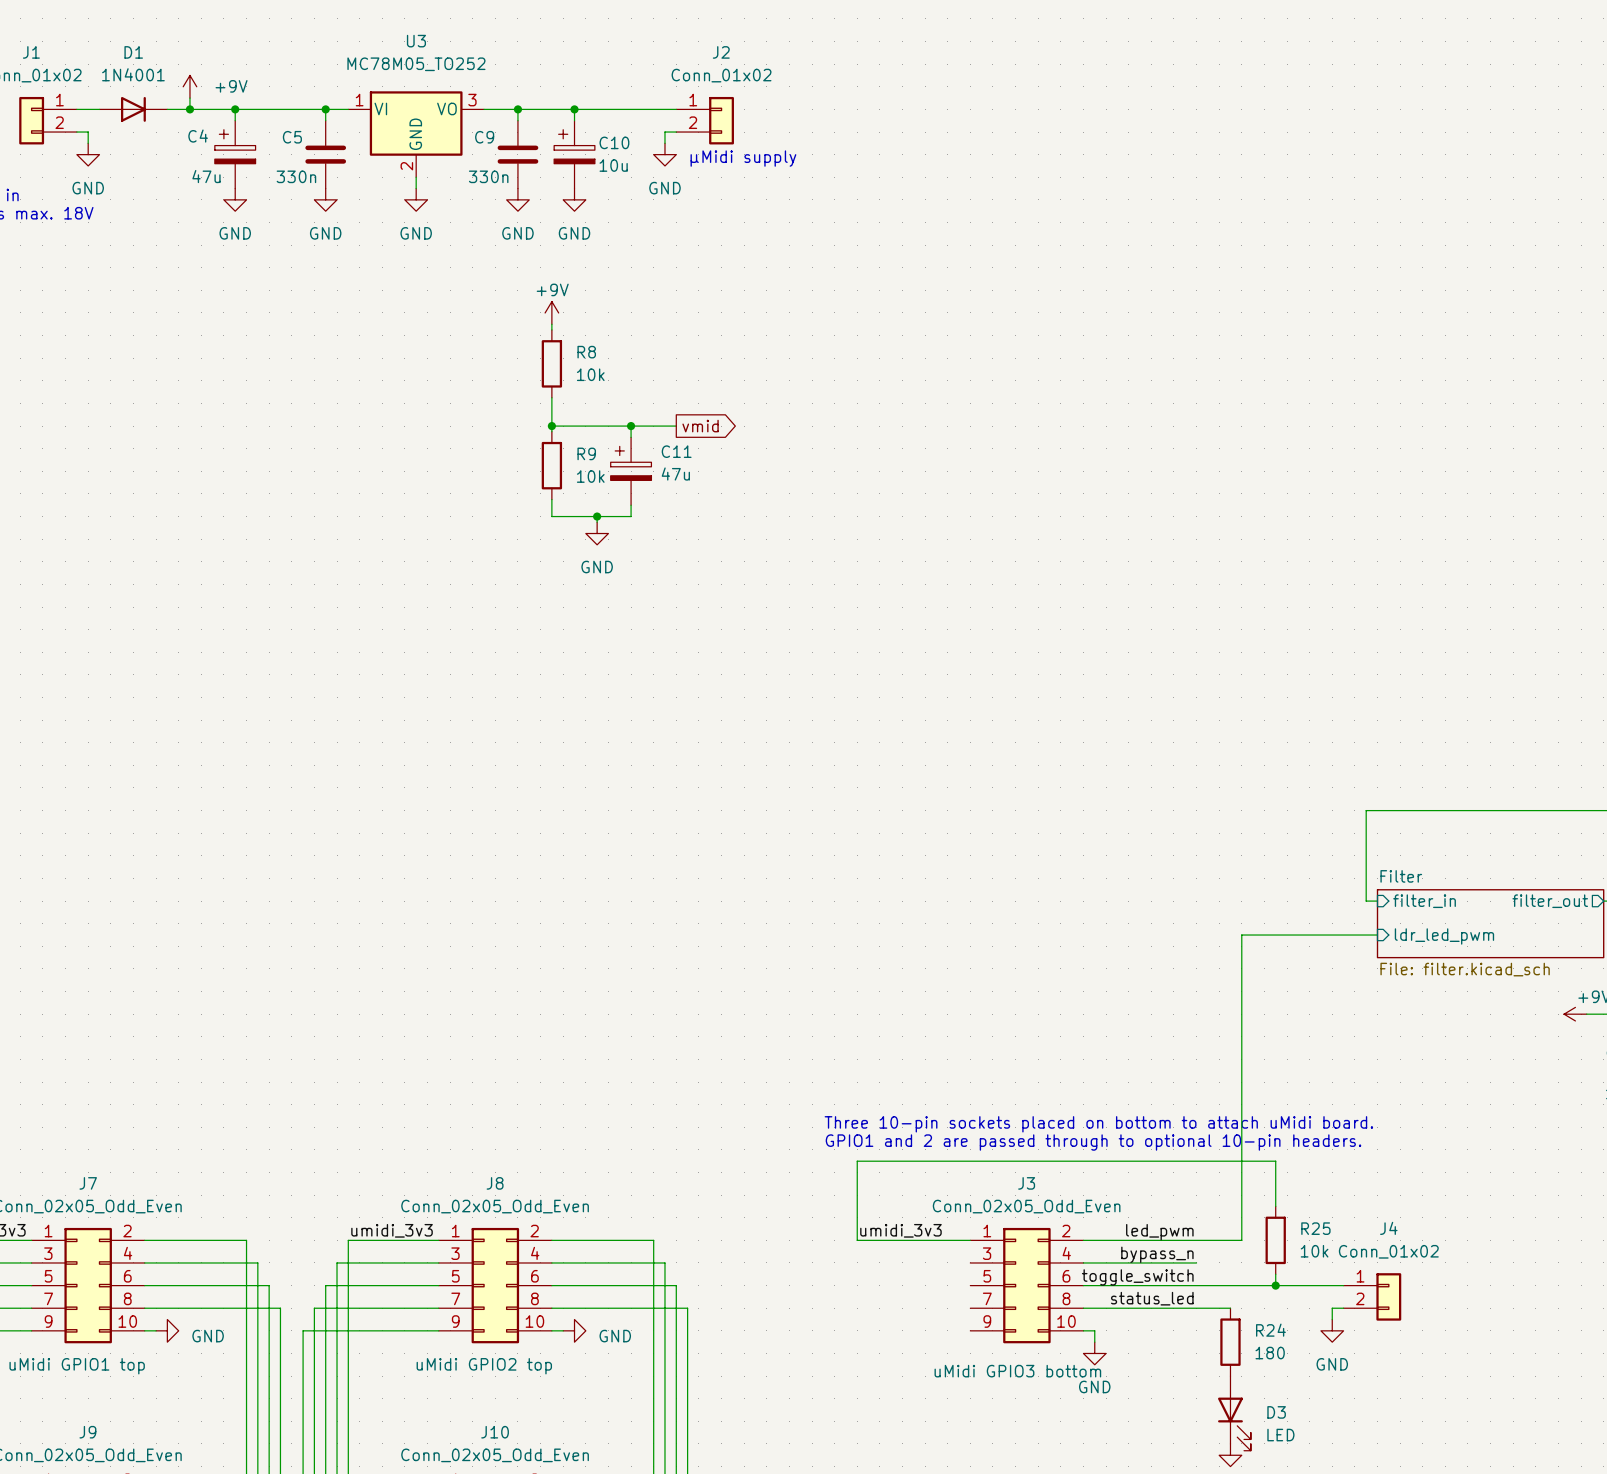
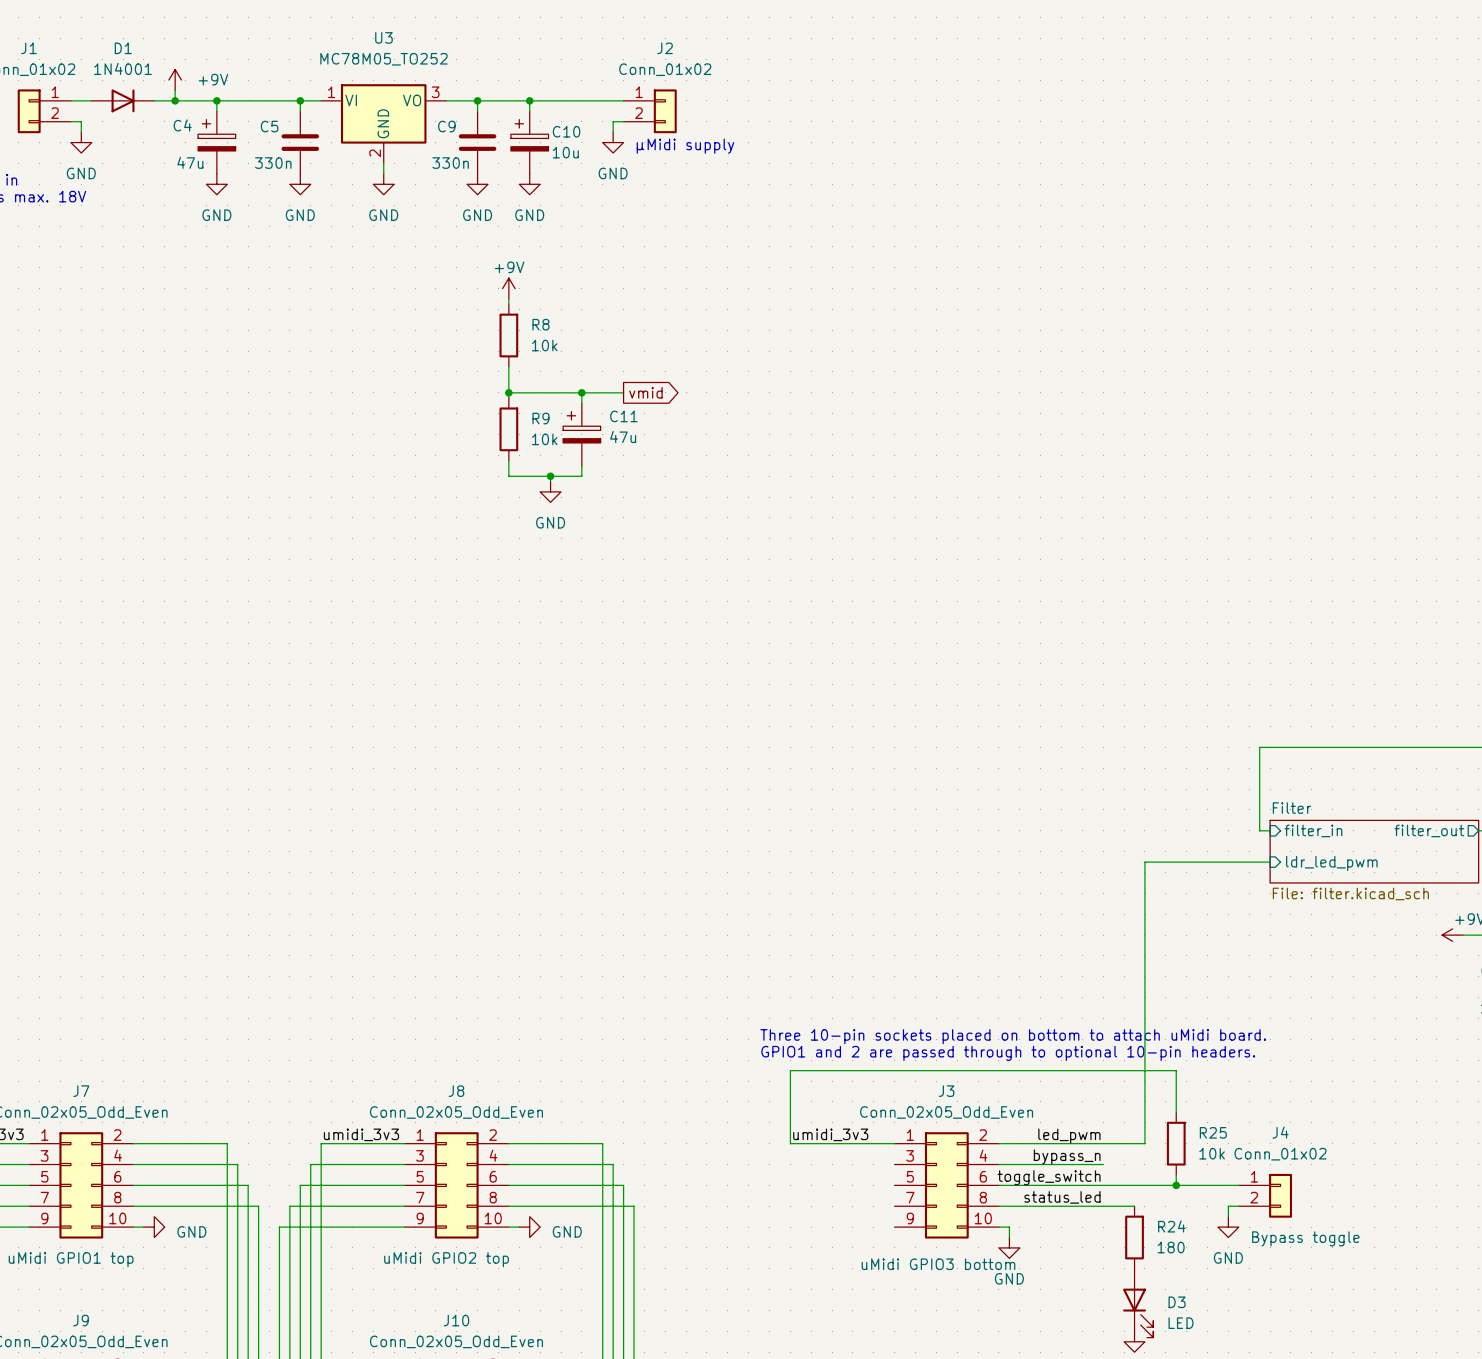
J4 text: none -> Bypass toggle (1305, 1238)

